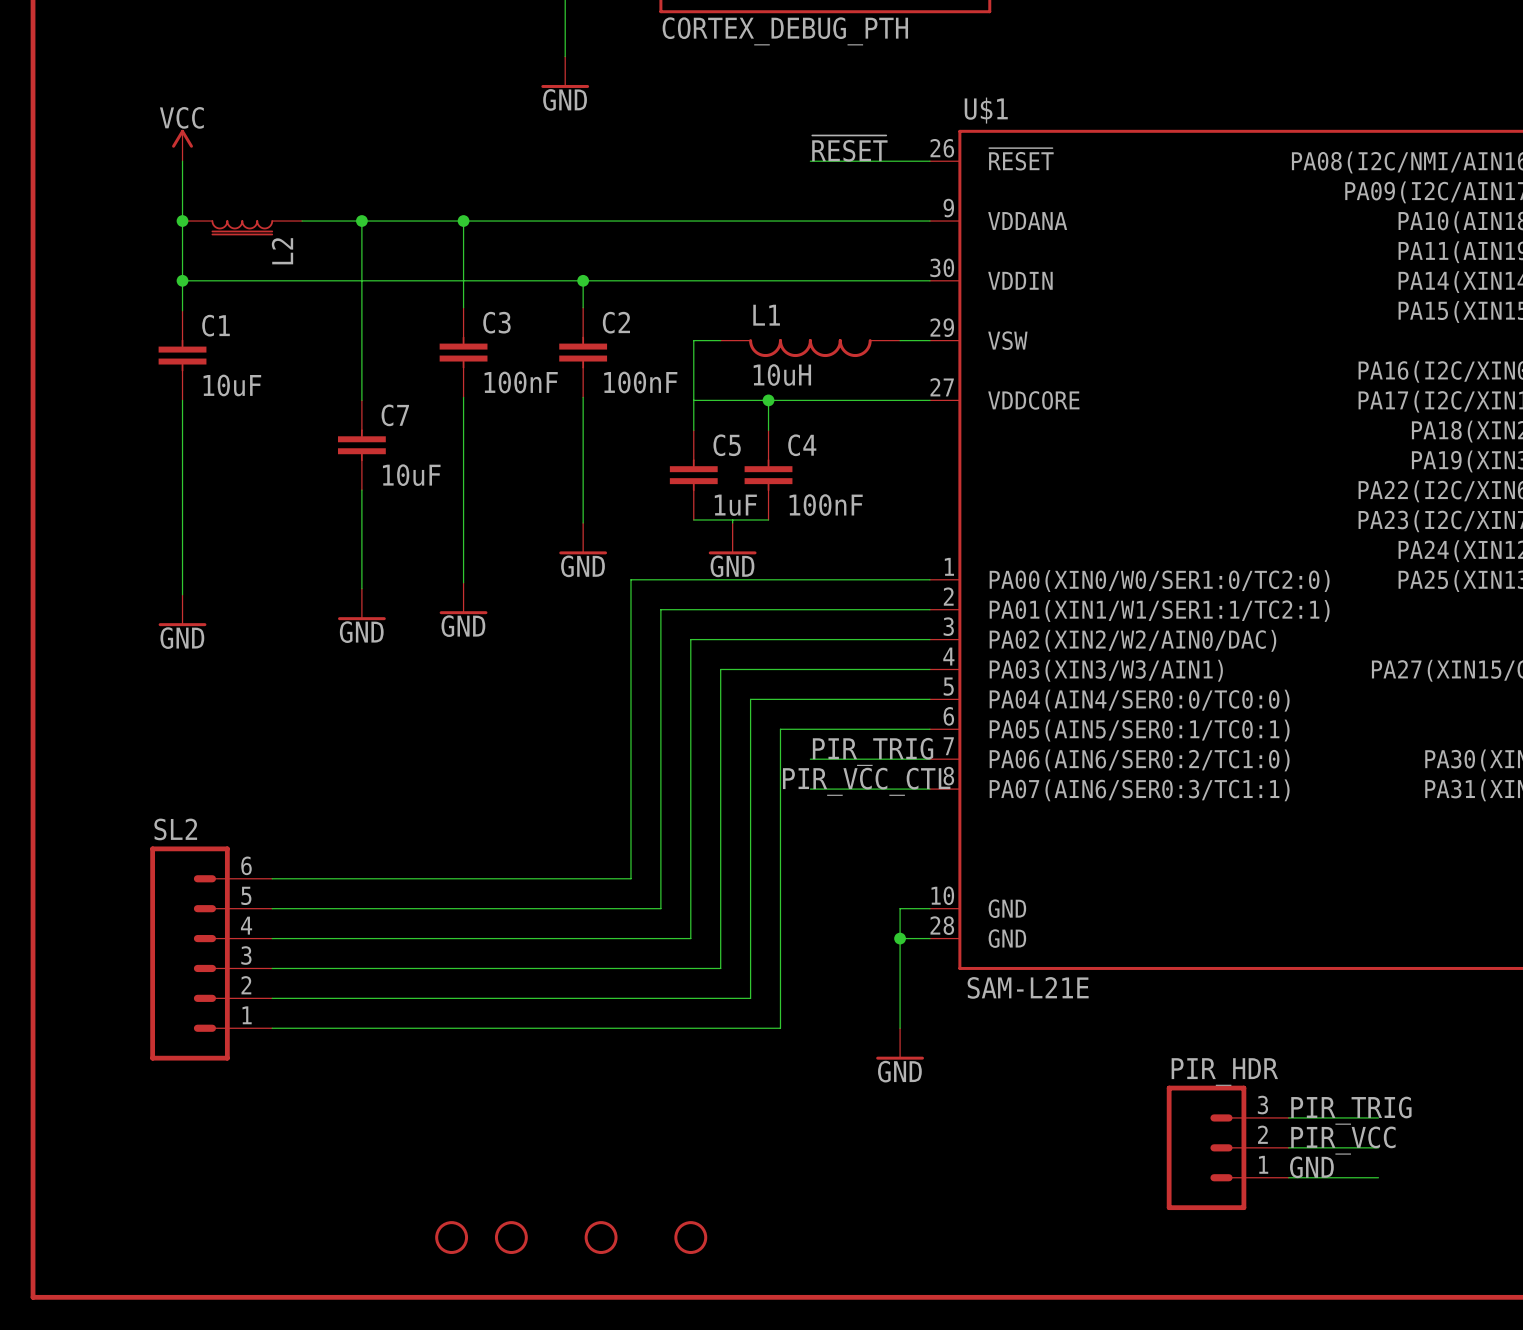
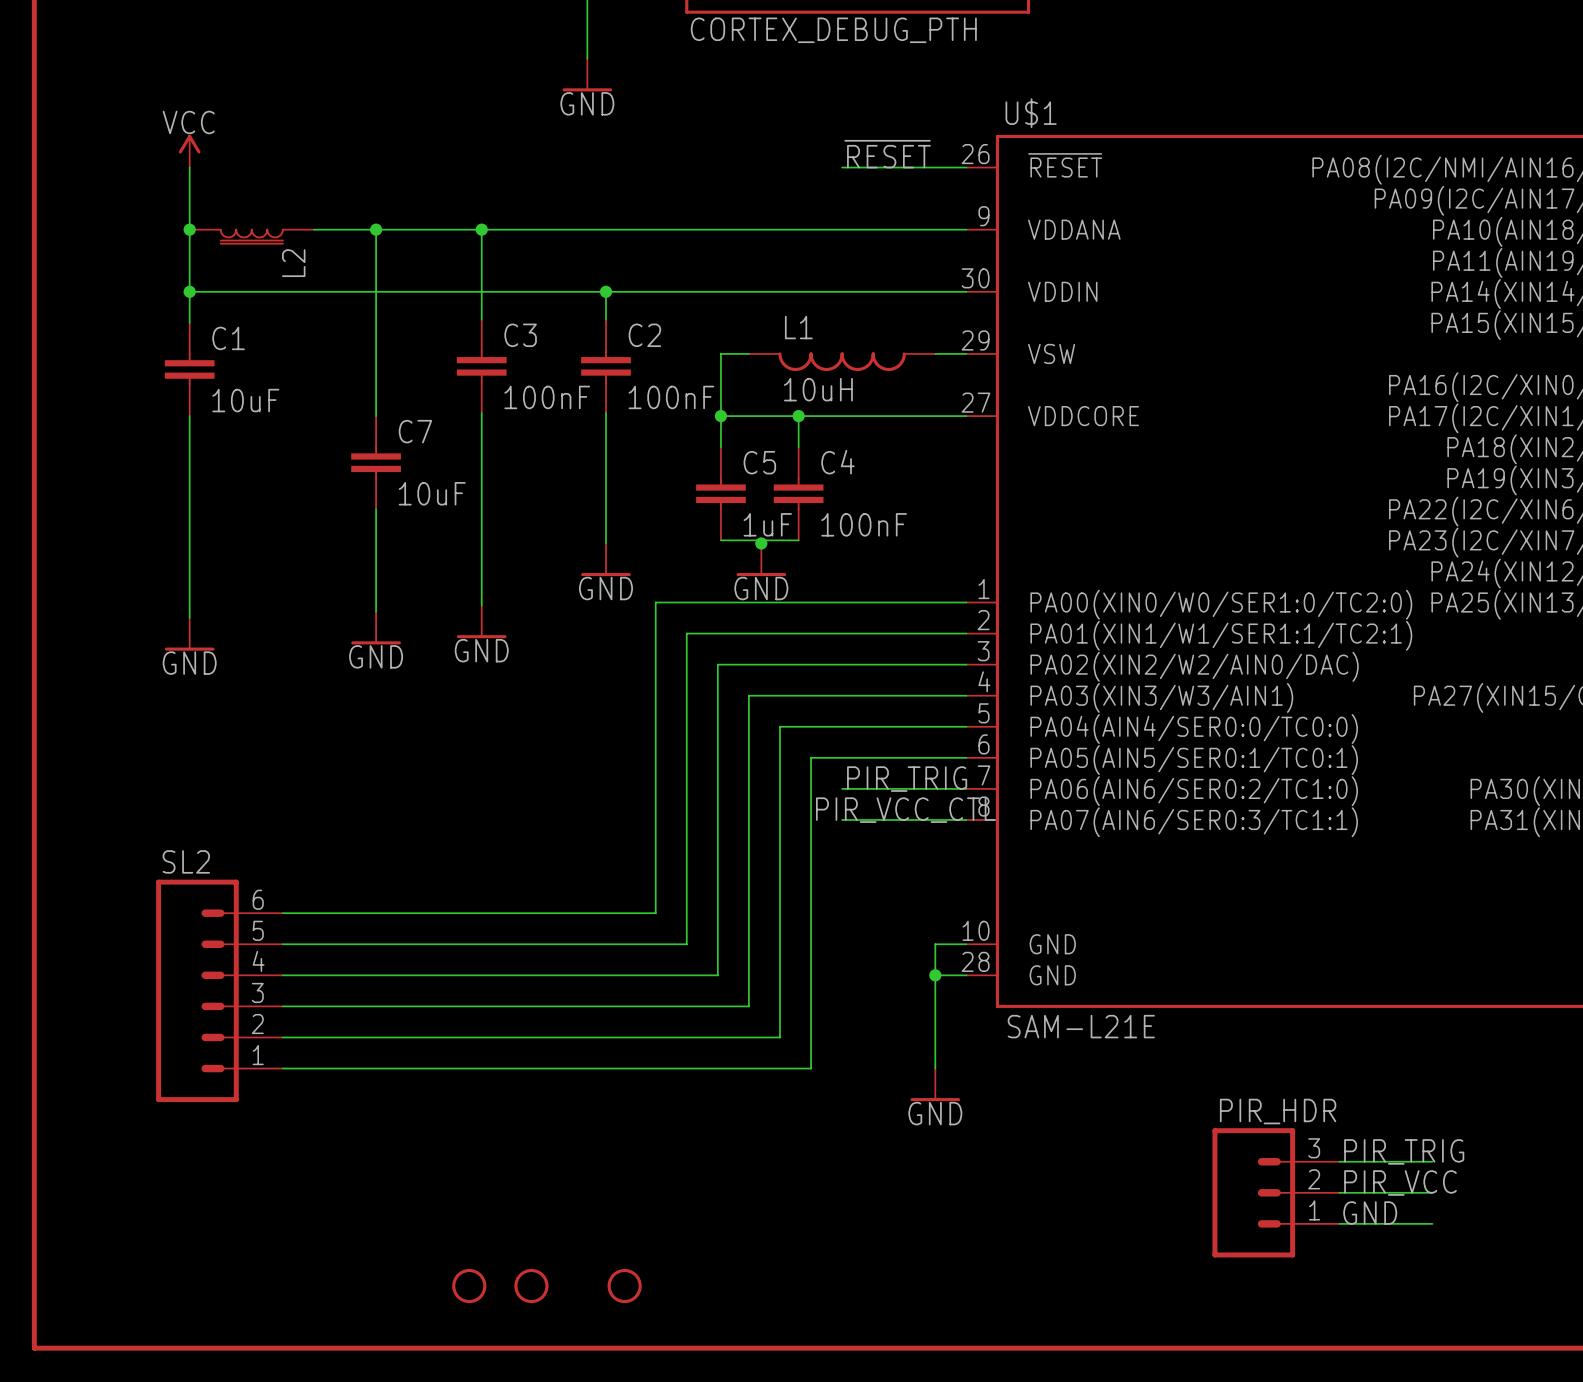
junction: none -> (720, 416)
junction: none -> (761, 543)
part: (690, 1237) -> none

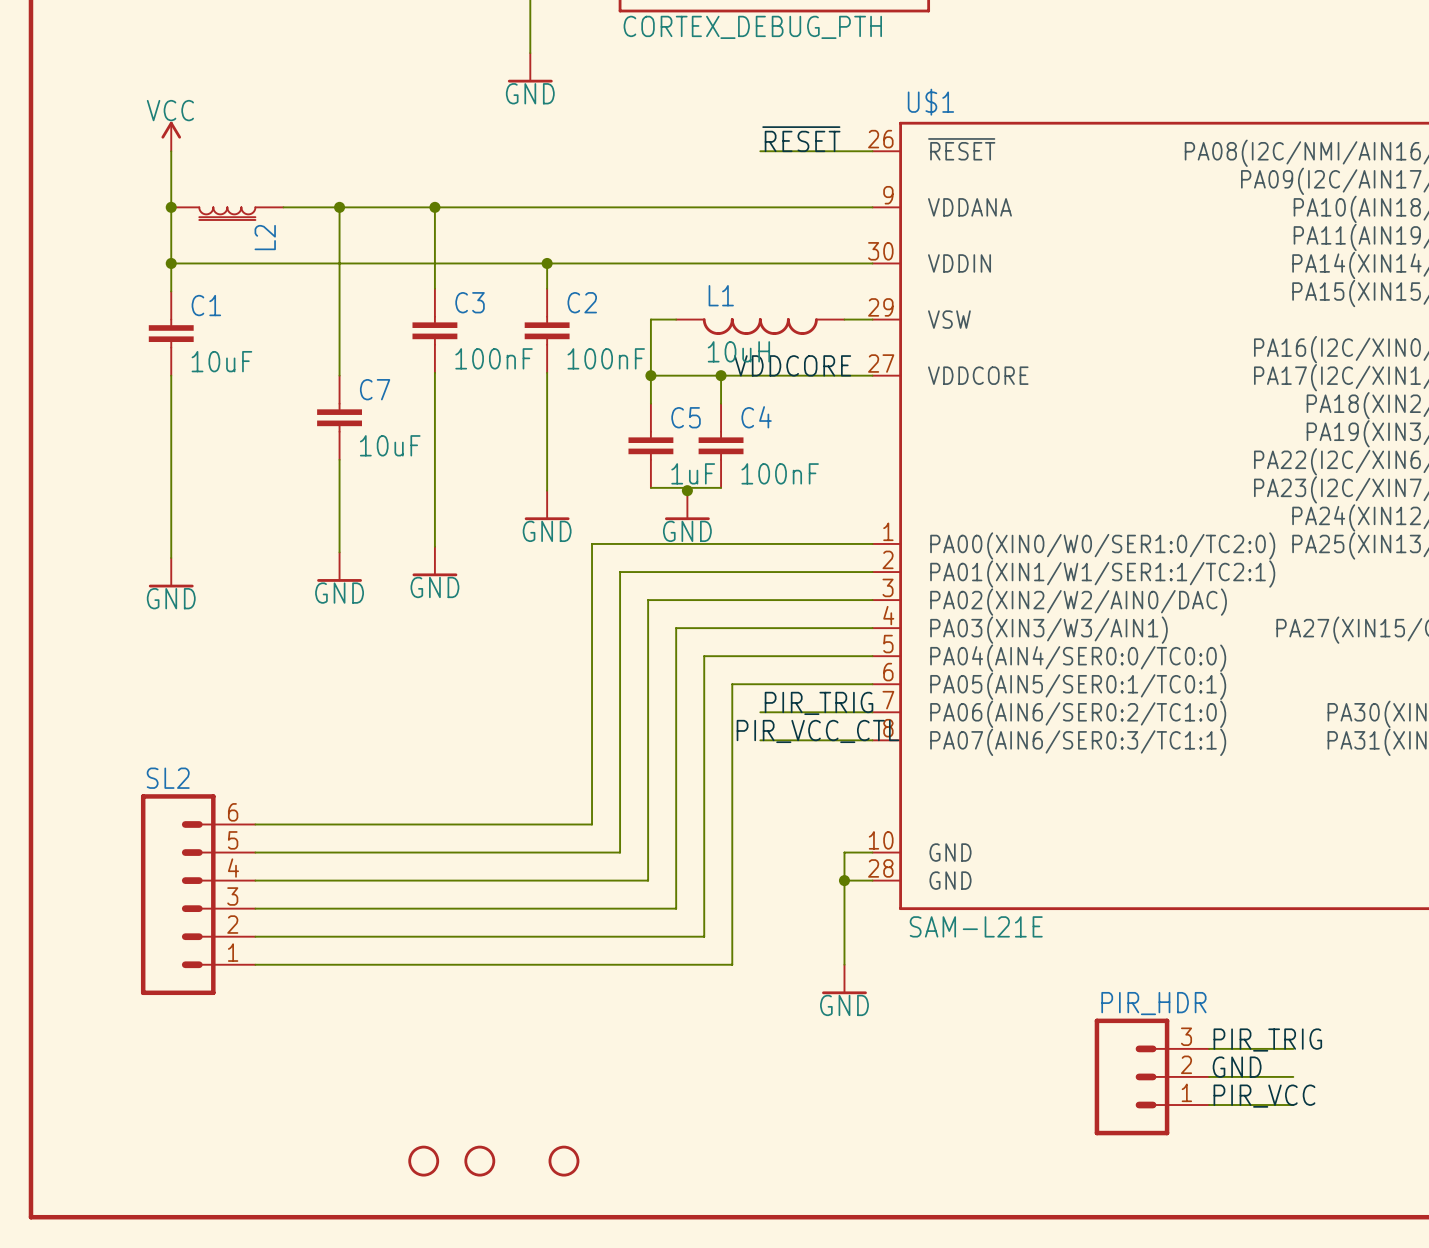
label: none -> VDDCORE (792, 365)
label: PIR_VCC (1400, 1182) -> GND (1237, 1067)
label: GND (1370, 1213) -> PIR_VCC (1264, 1096)

